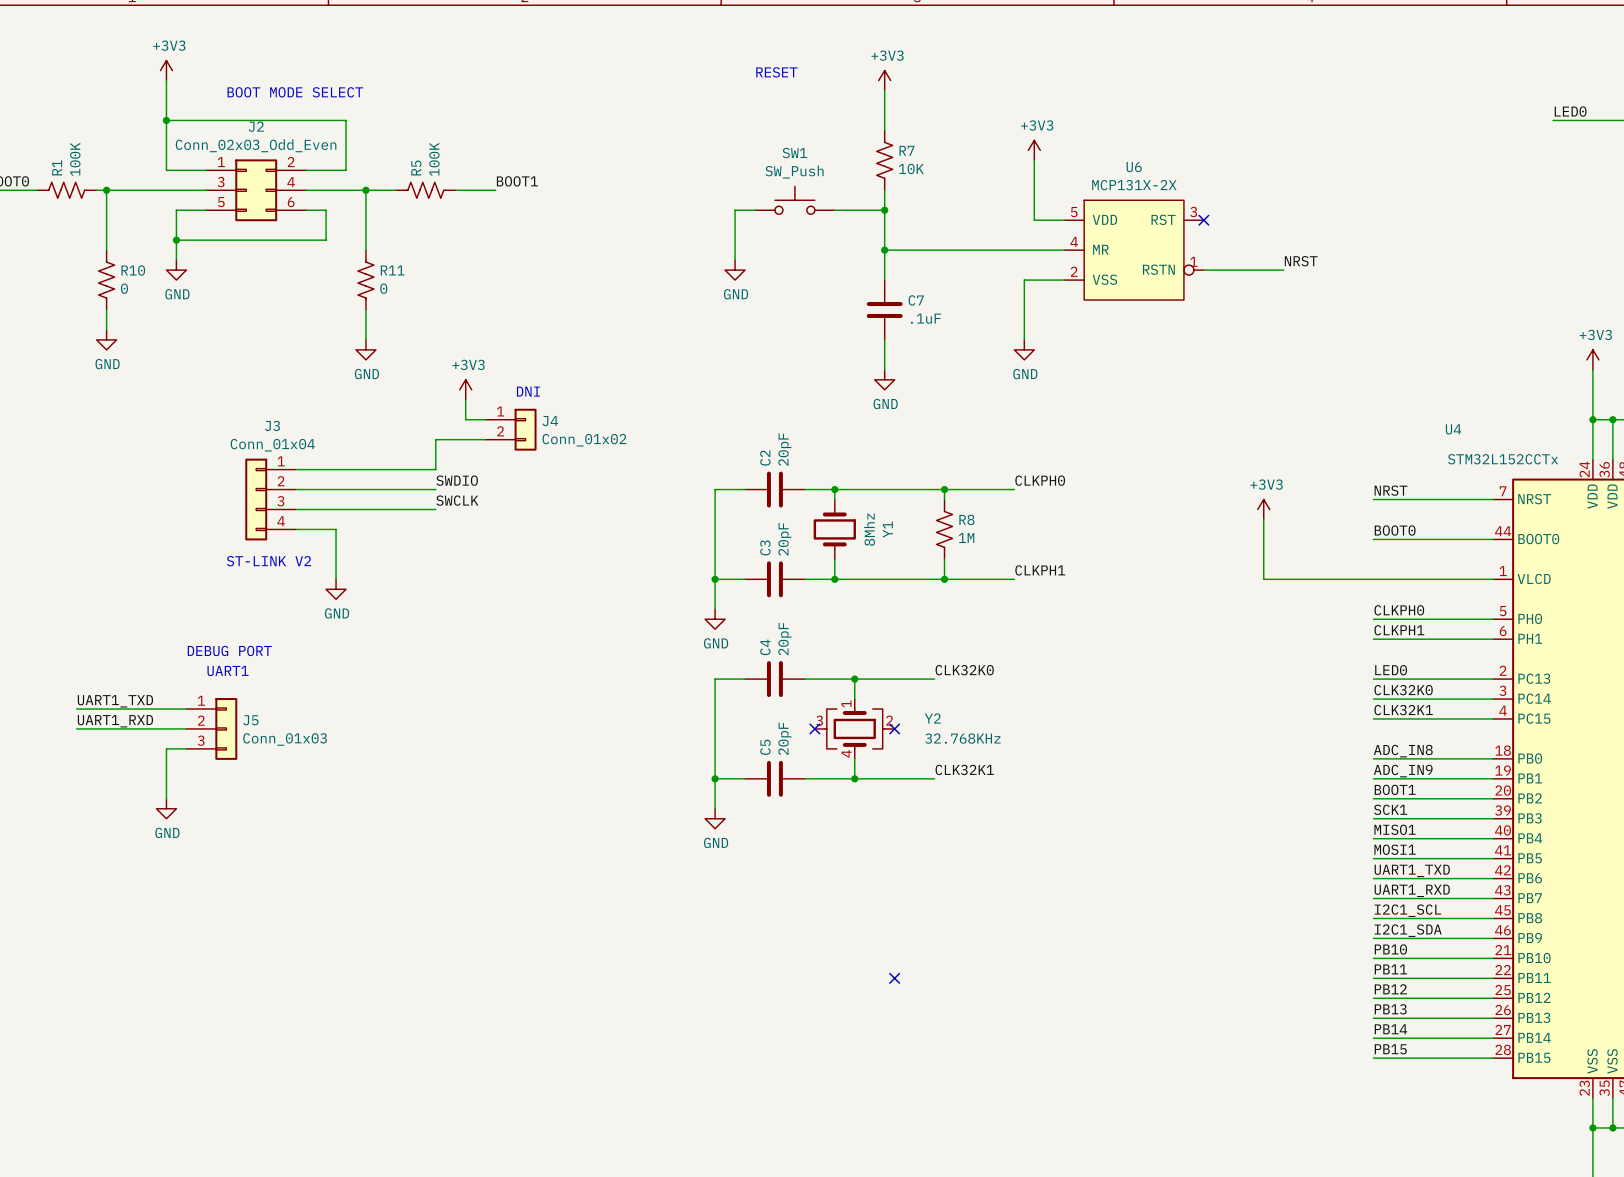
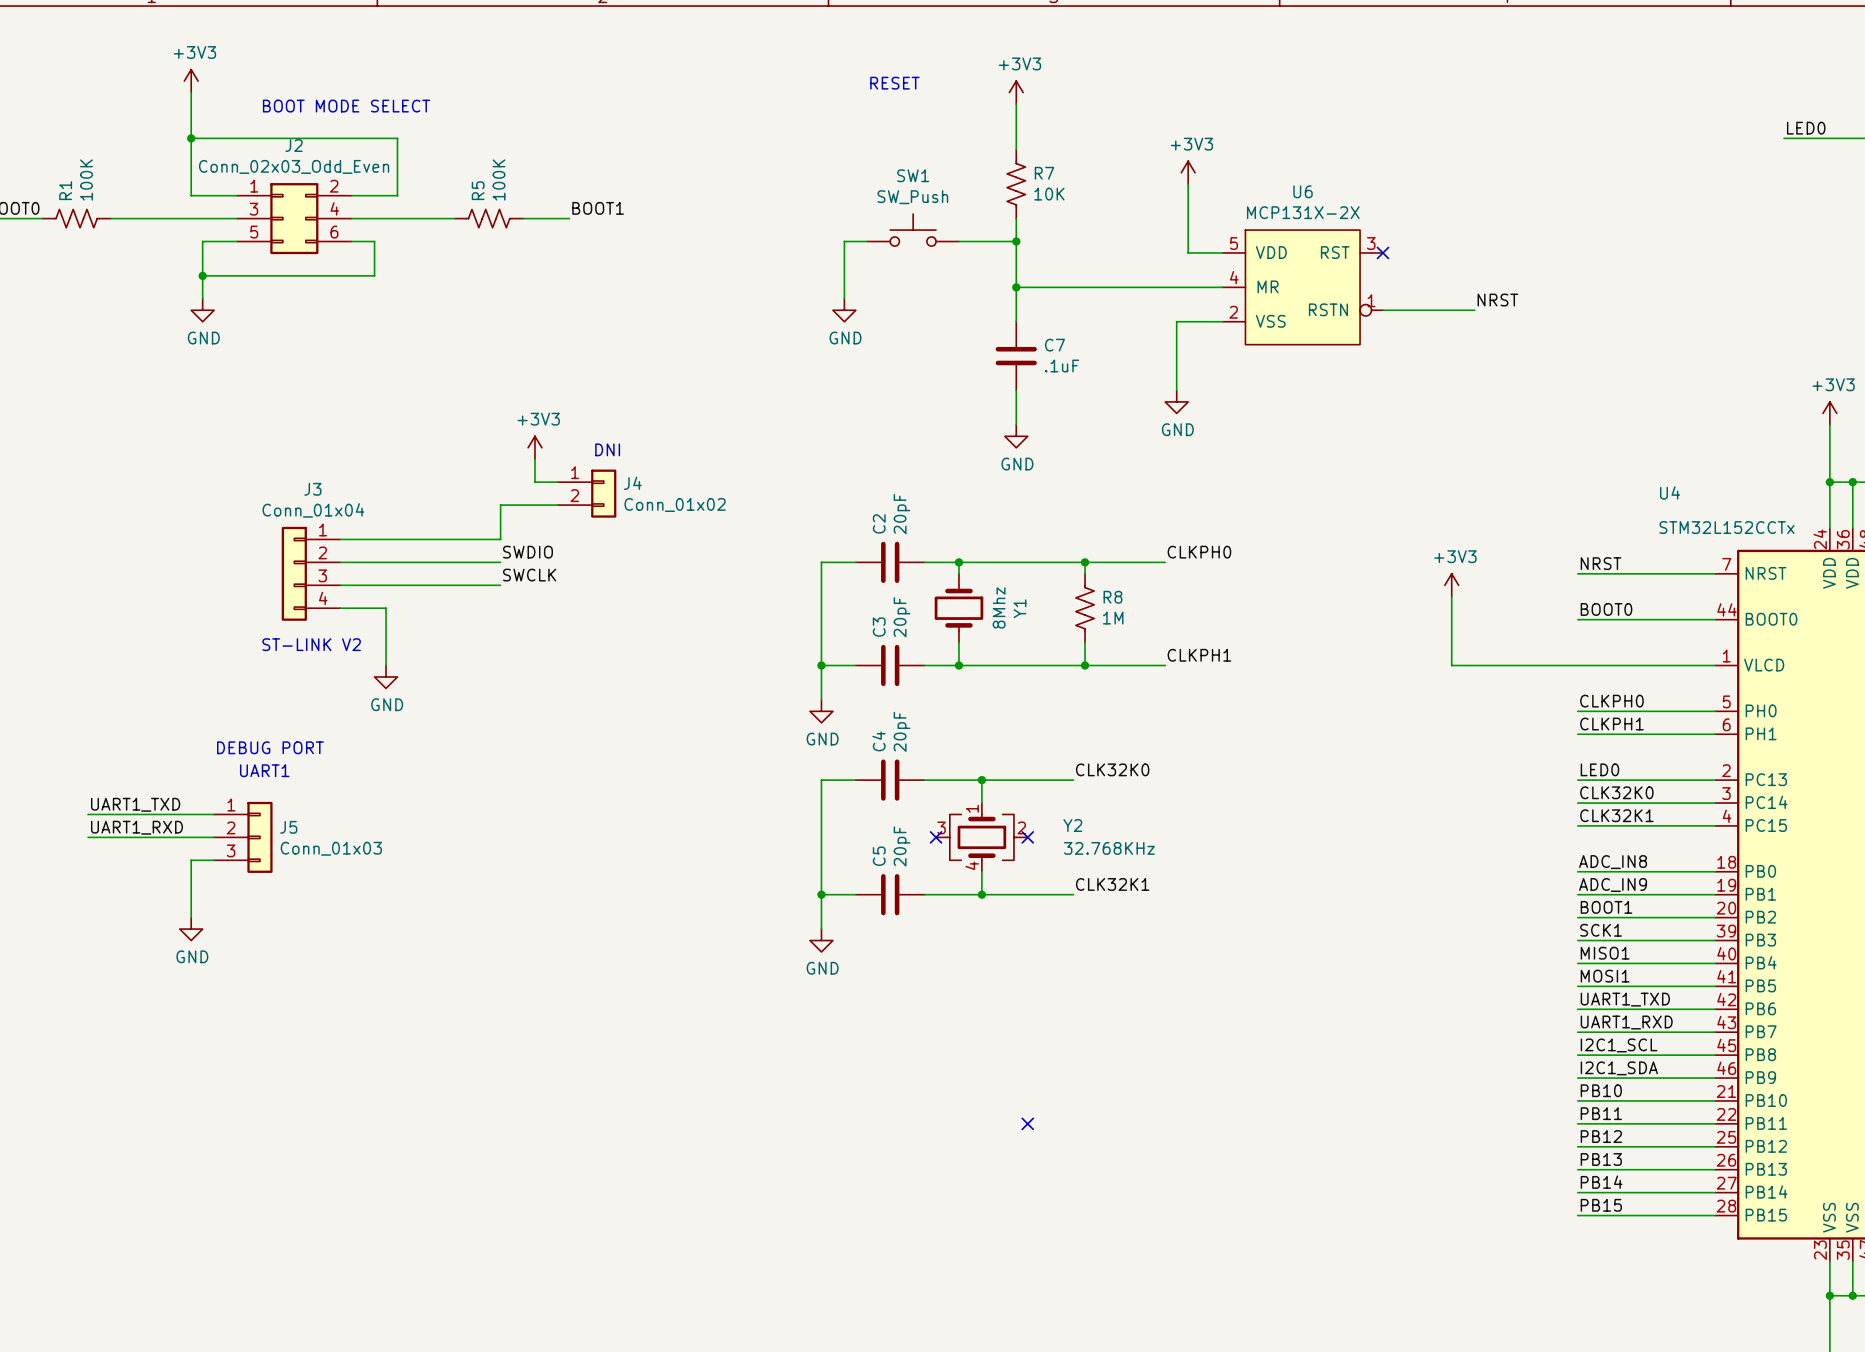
wire: (106, 190) (106, 250) -> none
junction: (106, 190) -> none
wire: (365, 190) (365, 250) -> none
junction: (365, 190) -> none
R10: 0 (106, 280) -> none
R11: 0 (365, 280) -> none
wire: (106, 309) (106, 329) -> none
wire: (365, 309) (365, 339) -> none
power symbol: GND (106, 339) -> none
power symbol: GND (365, 349) -> none

